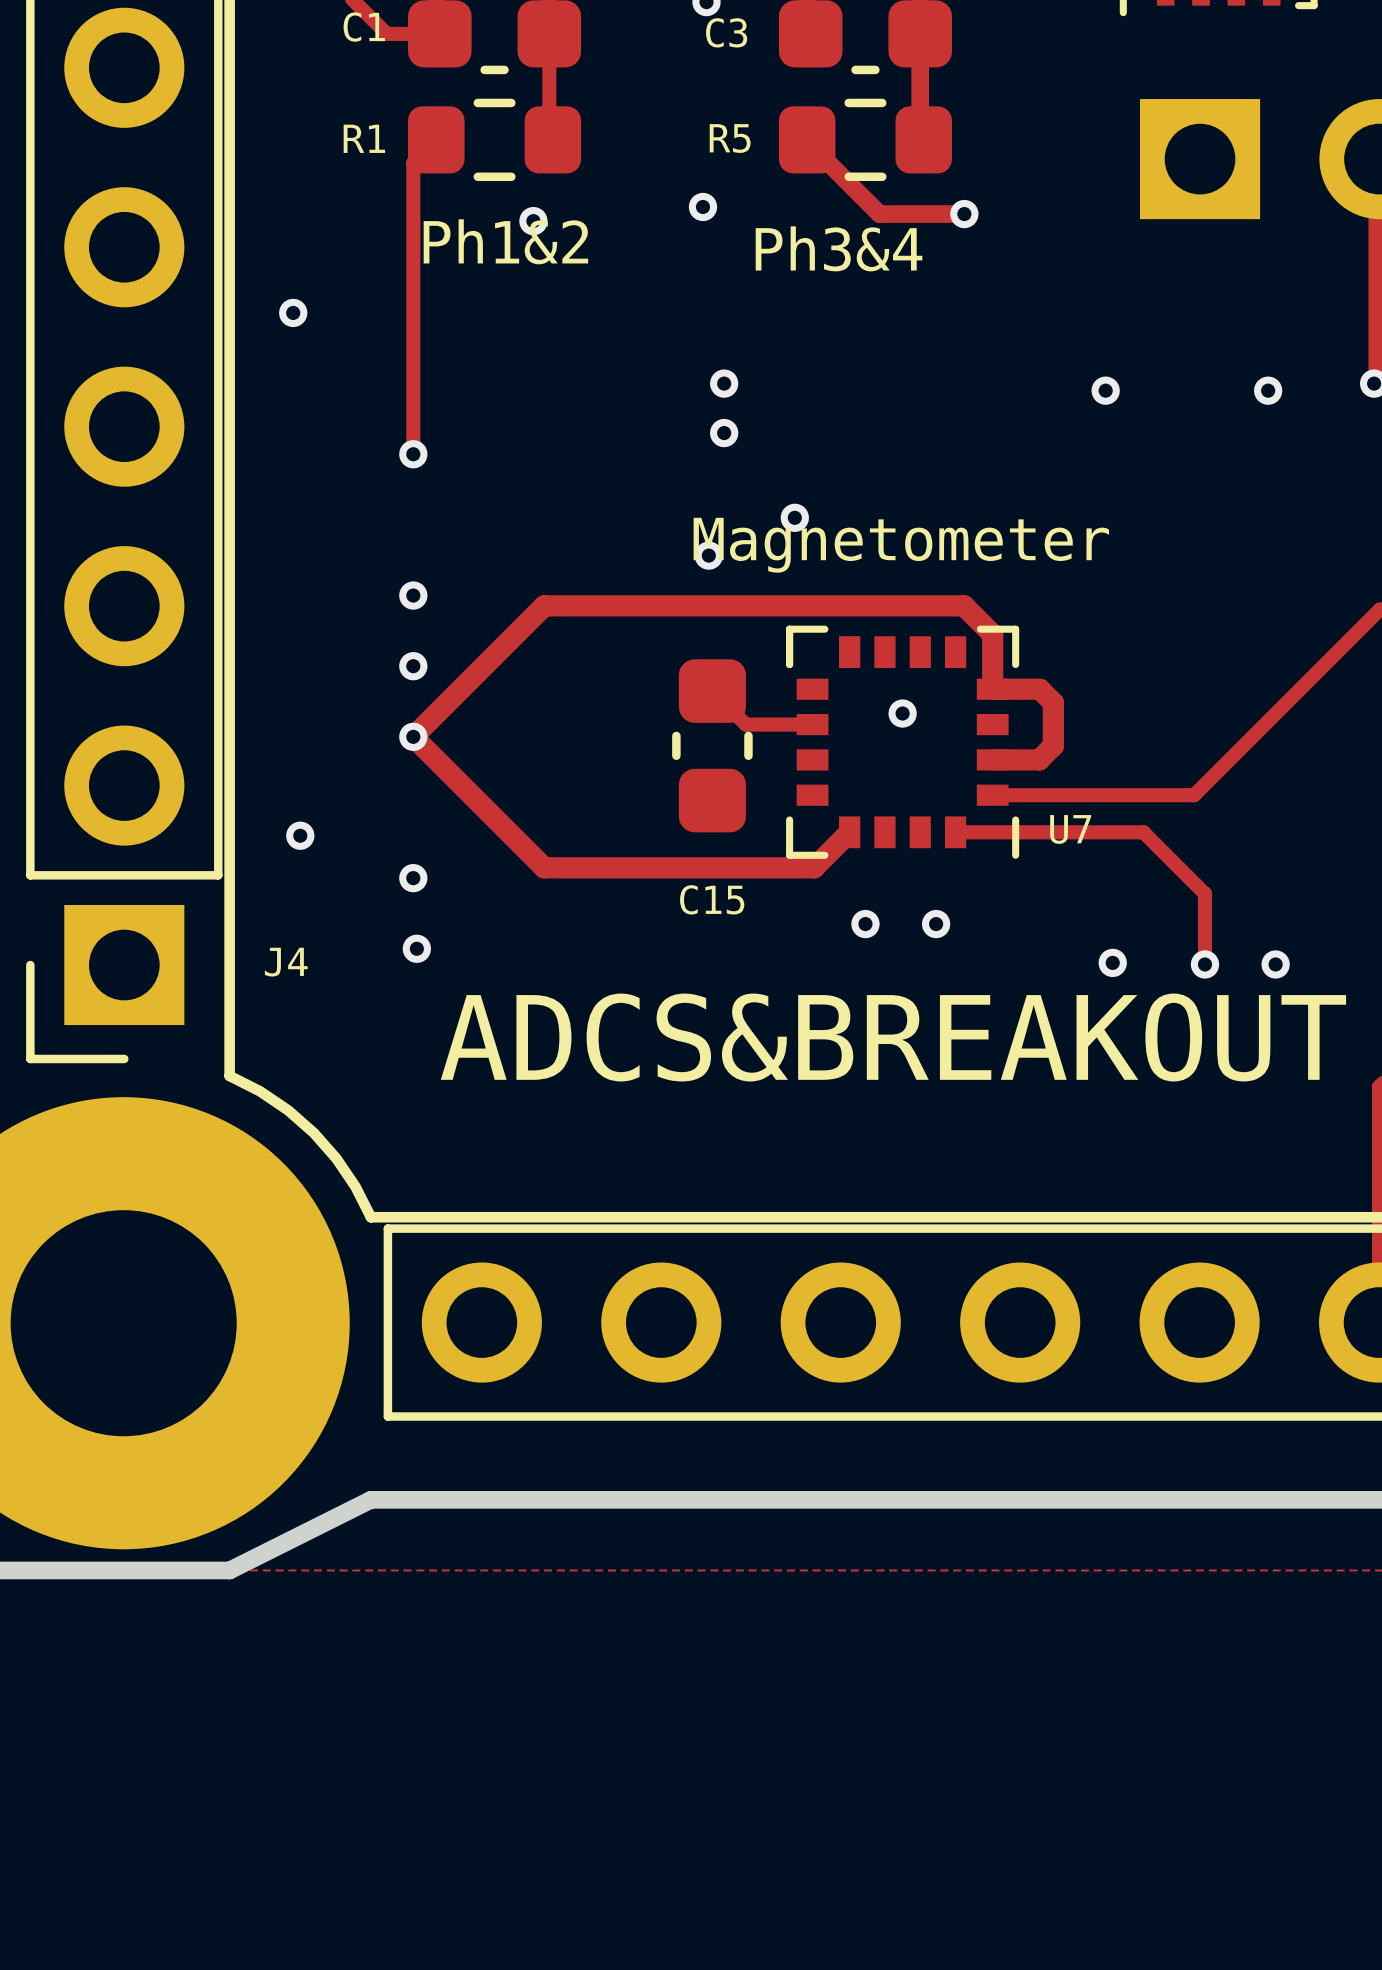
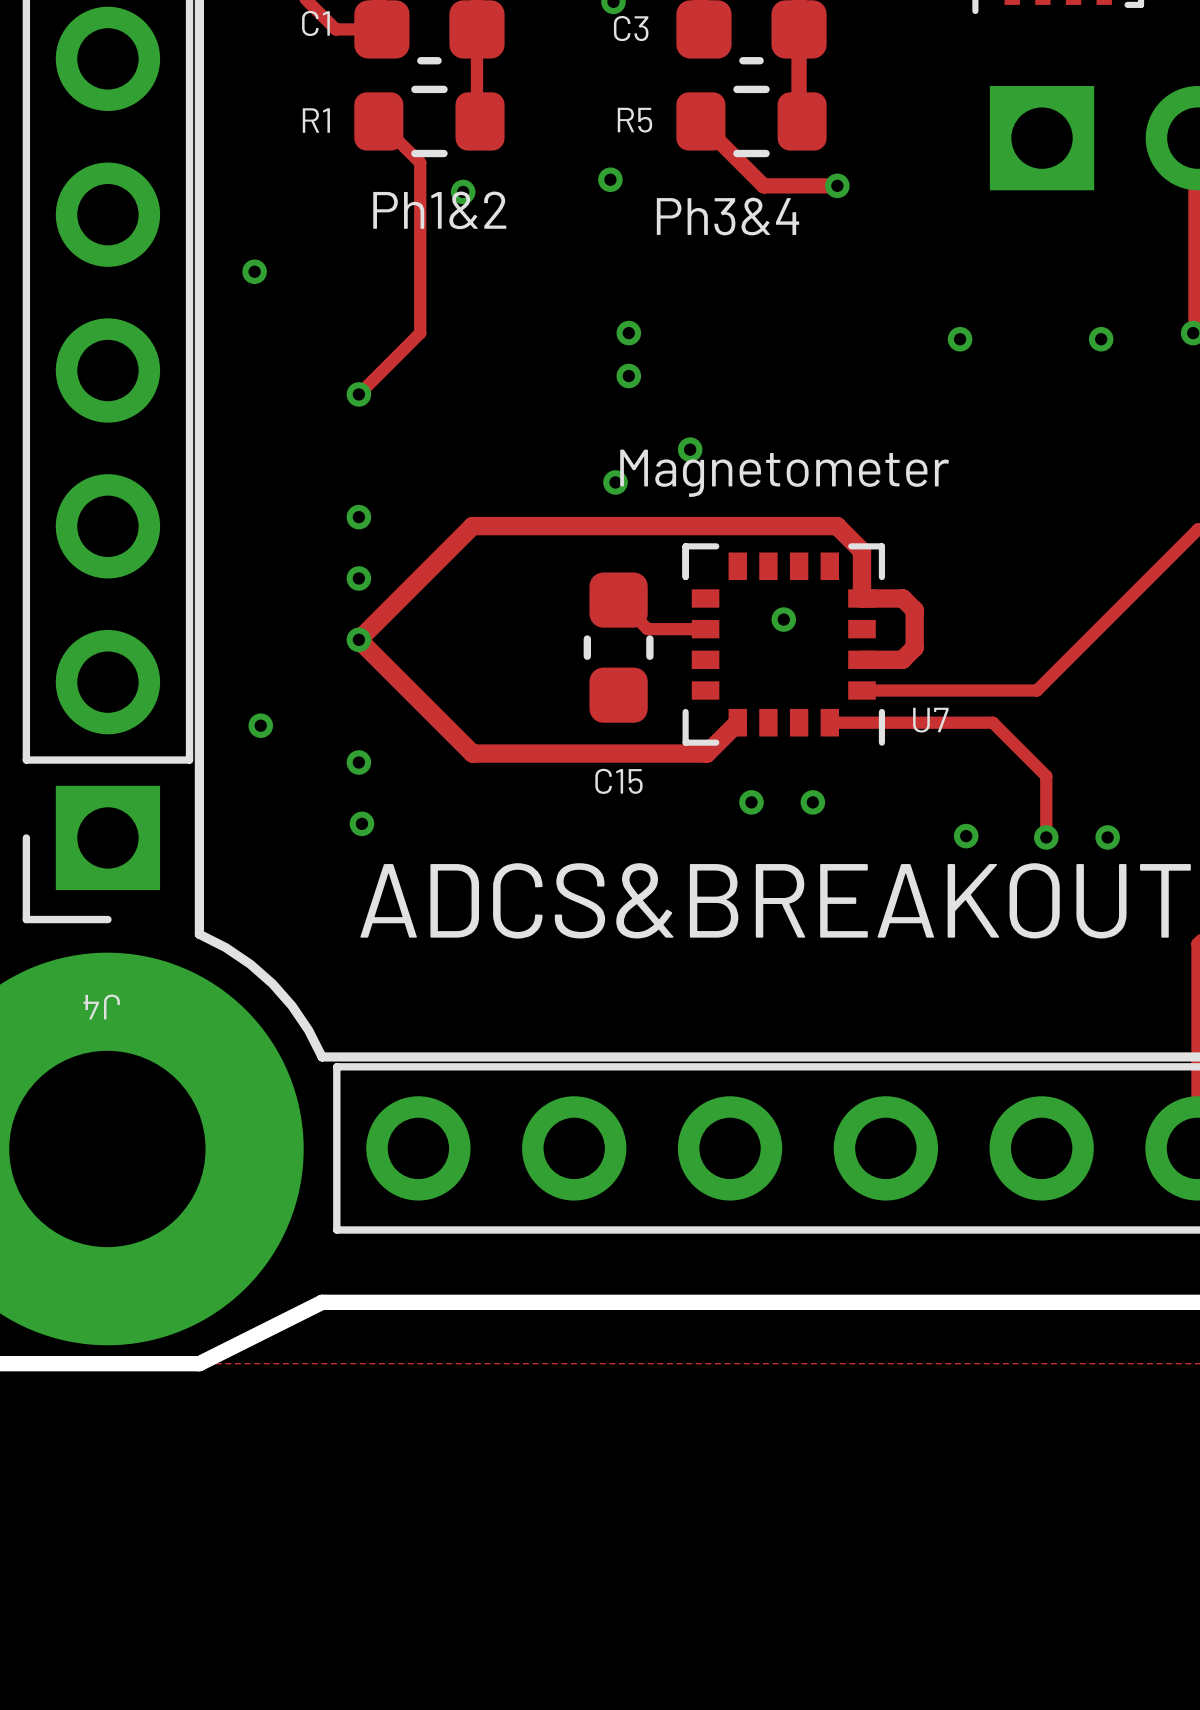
track: (436, 139) (413, 162) (413, 454) -> (378, 121) (420, 162) (420, 333) (358, 394)
J4 name rotation: 0° (286, 962) -> 180° (101, 1007)
J4 name position: J4 (286, 962) -> J4 (101, 1007)

